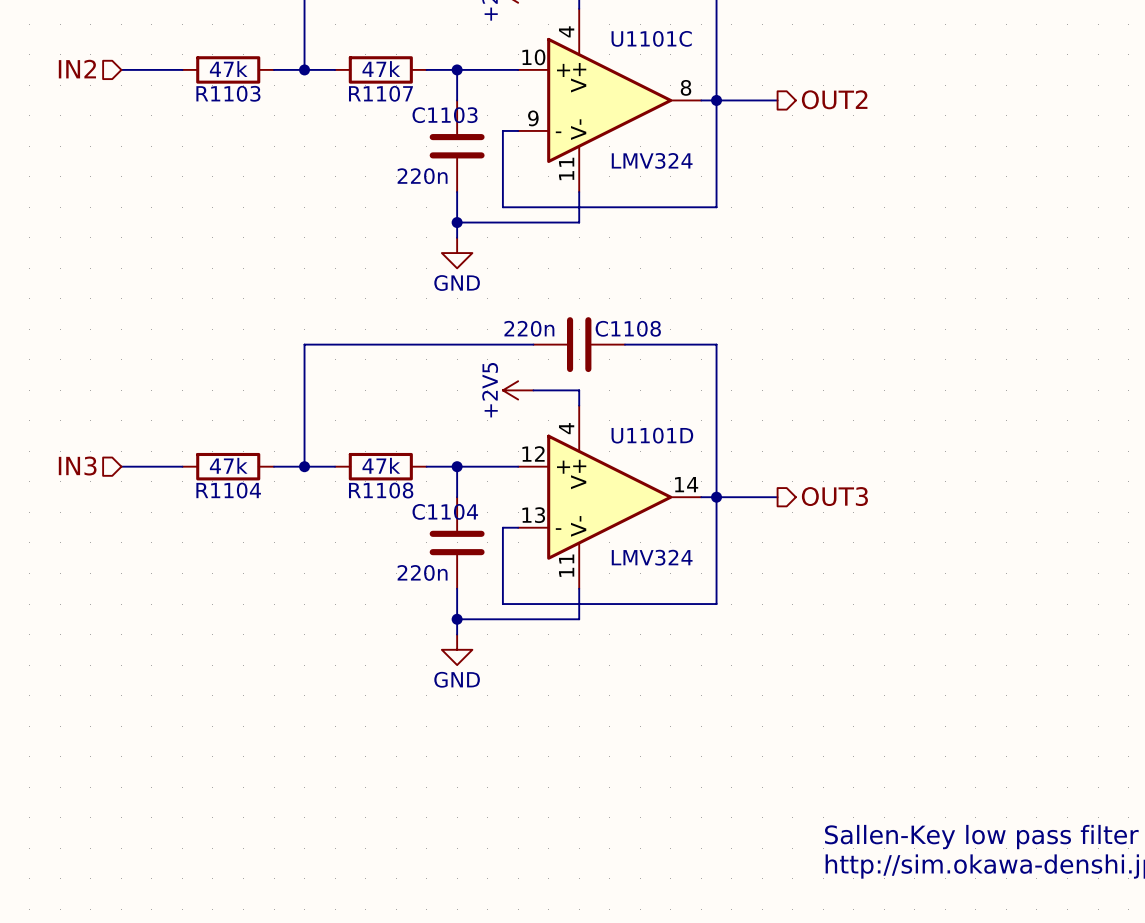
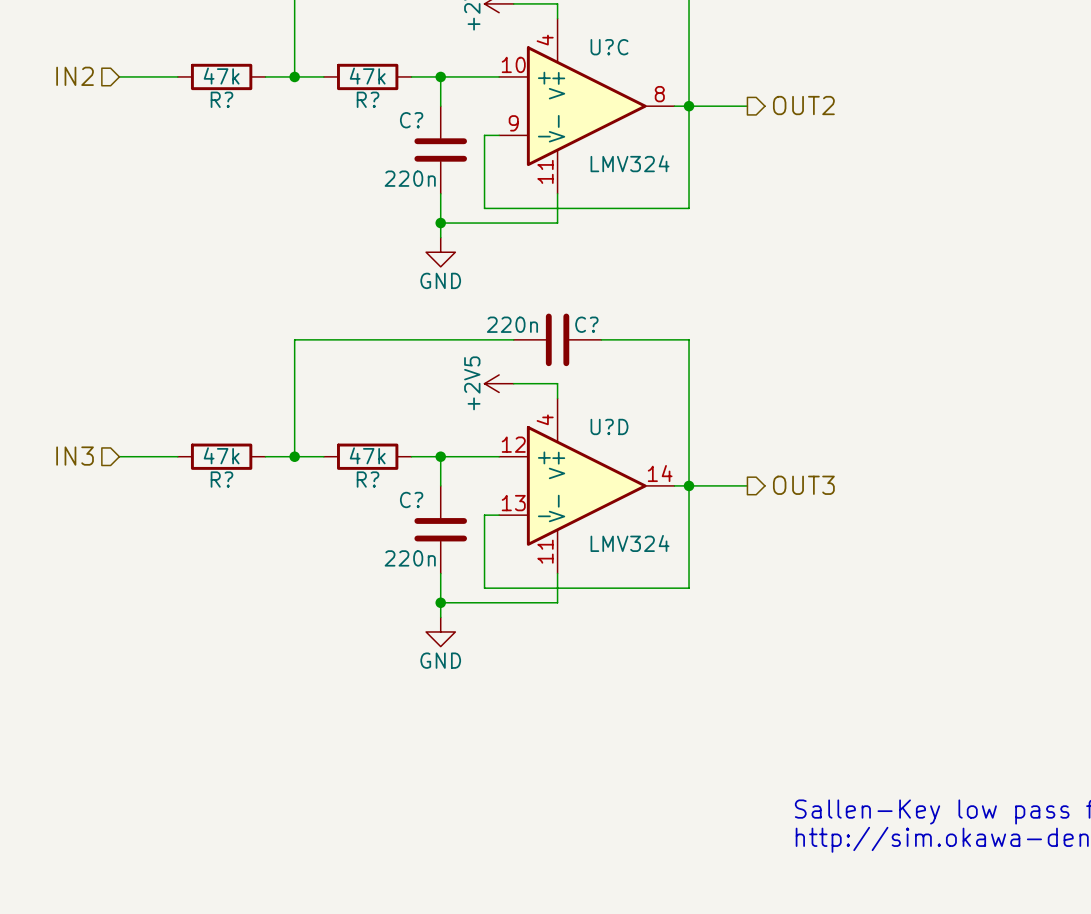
U1101C name: U1101C (651, 38) -> U?C (609, 47)
R1103 name: R1103 (228, 93) -> R? (221, 99)
R1107 name: R1107 (380, 93) -> R? (368, 99)
C1103 name: C1103 (445, 115) -> C? (411, 120)
C1108 name: C1108 (628, 328) -> C? (586, 324)
U1101D name: U1101D (652, 435) -> U?D (609, 426)
R1104 name: R1104 (228, 490) -> R? (221, 479)
R1108 name: R1108 (381, 490) -> R? (368, 479)
C1104 name: C1104 (445, 511) -> C? (411, 499)

